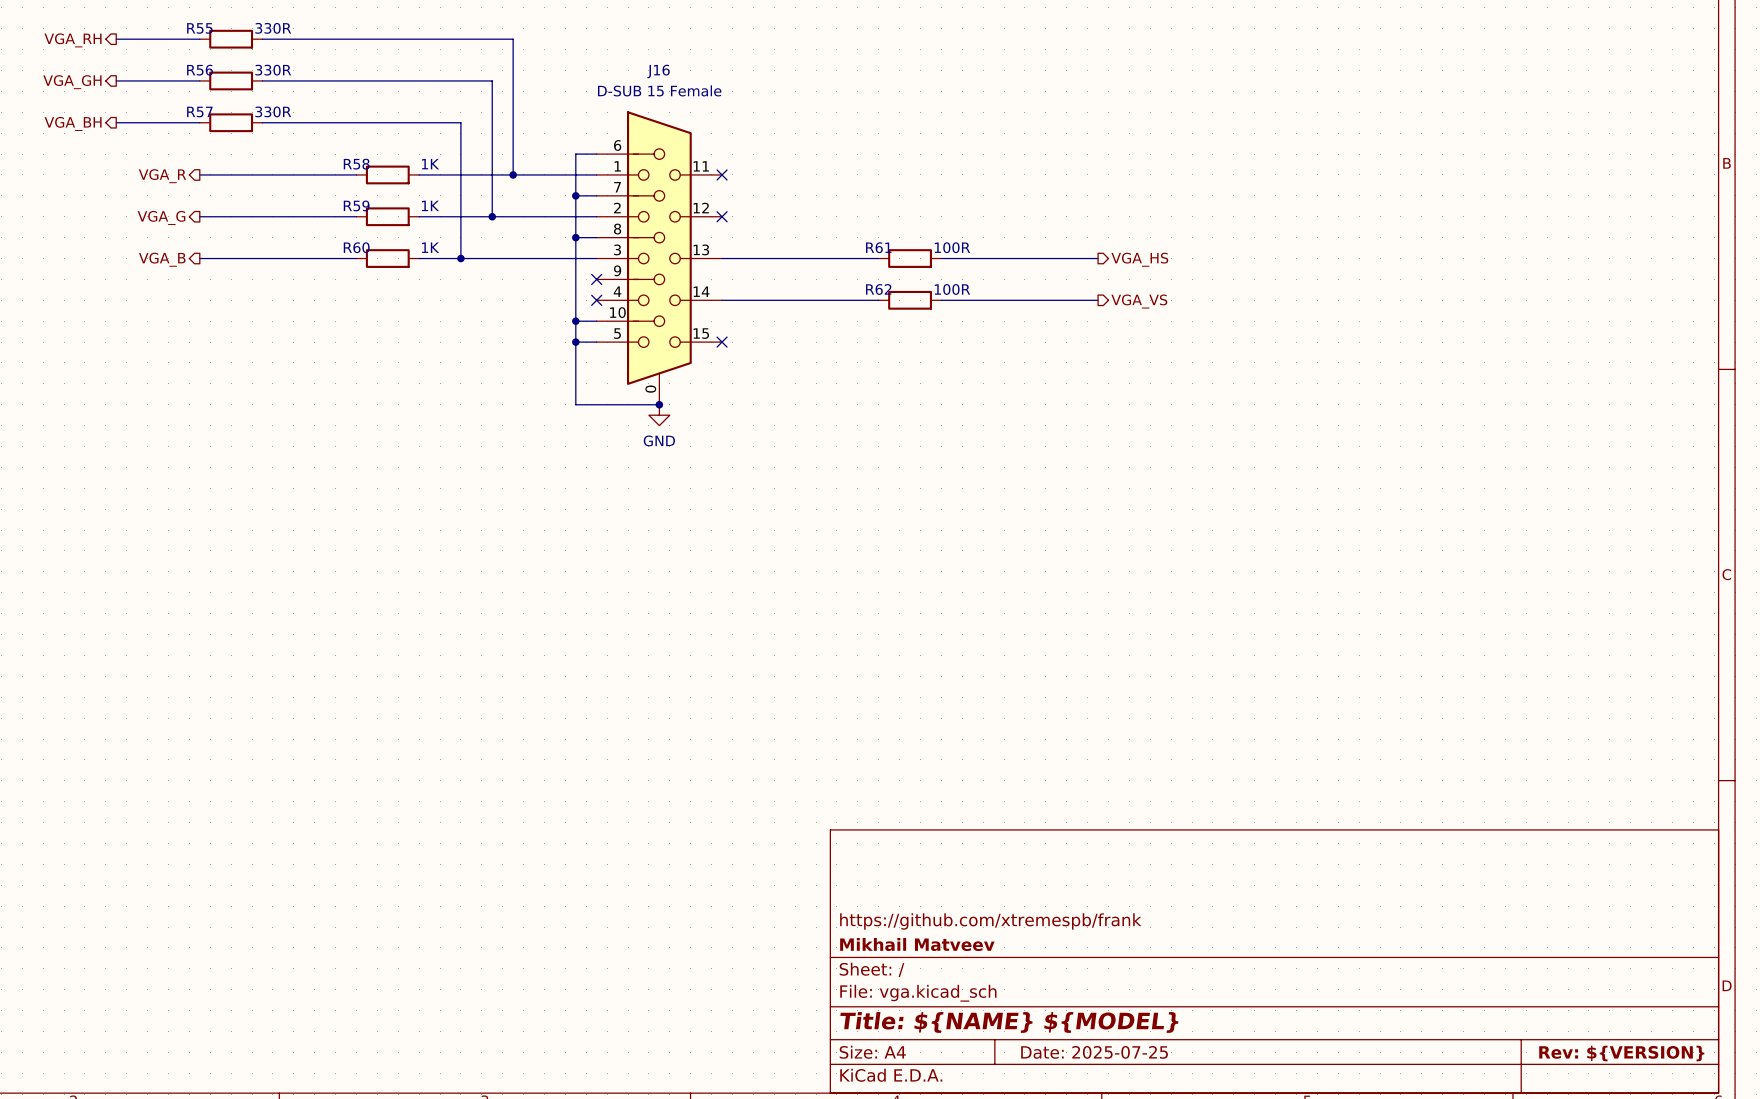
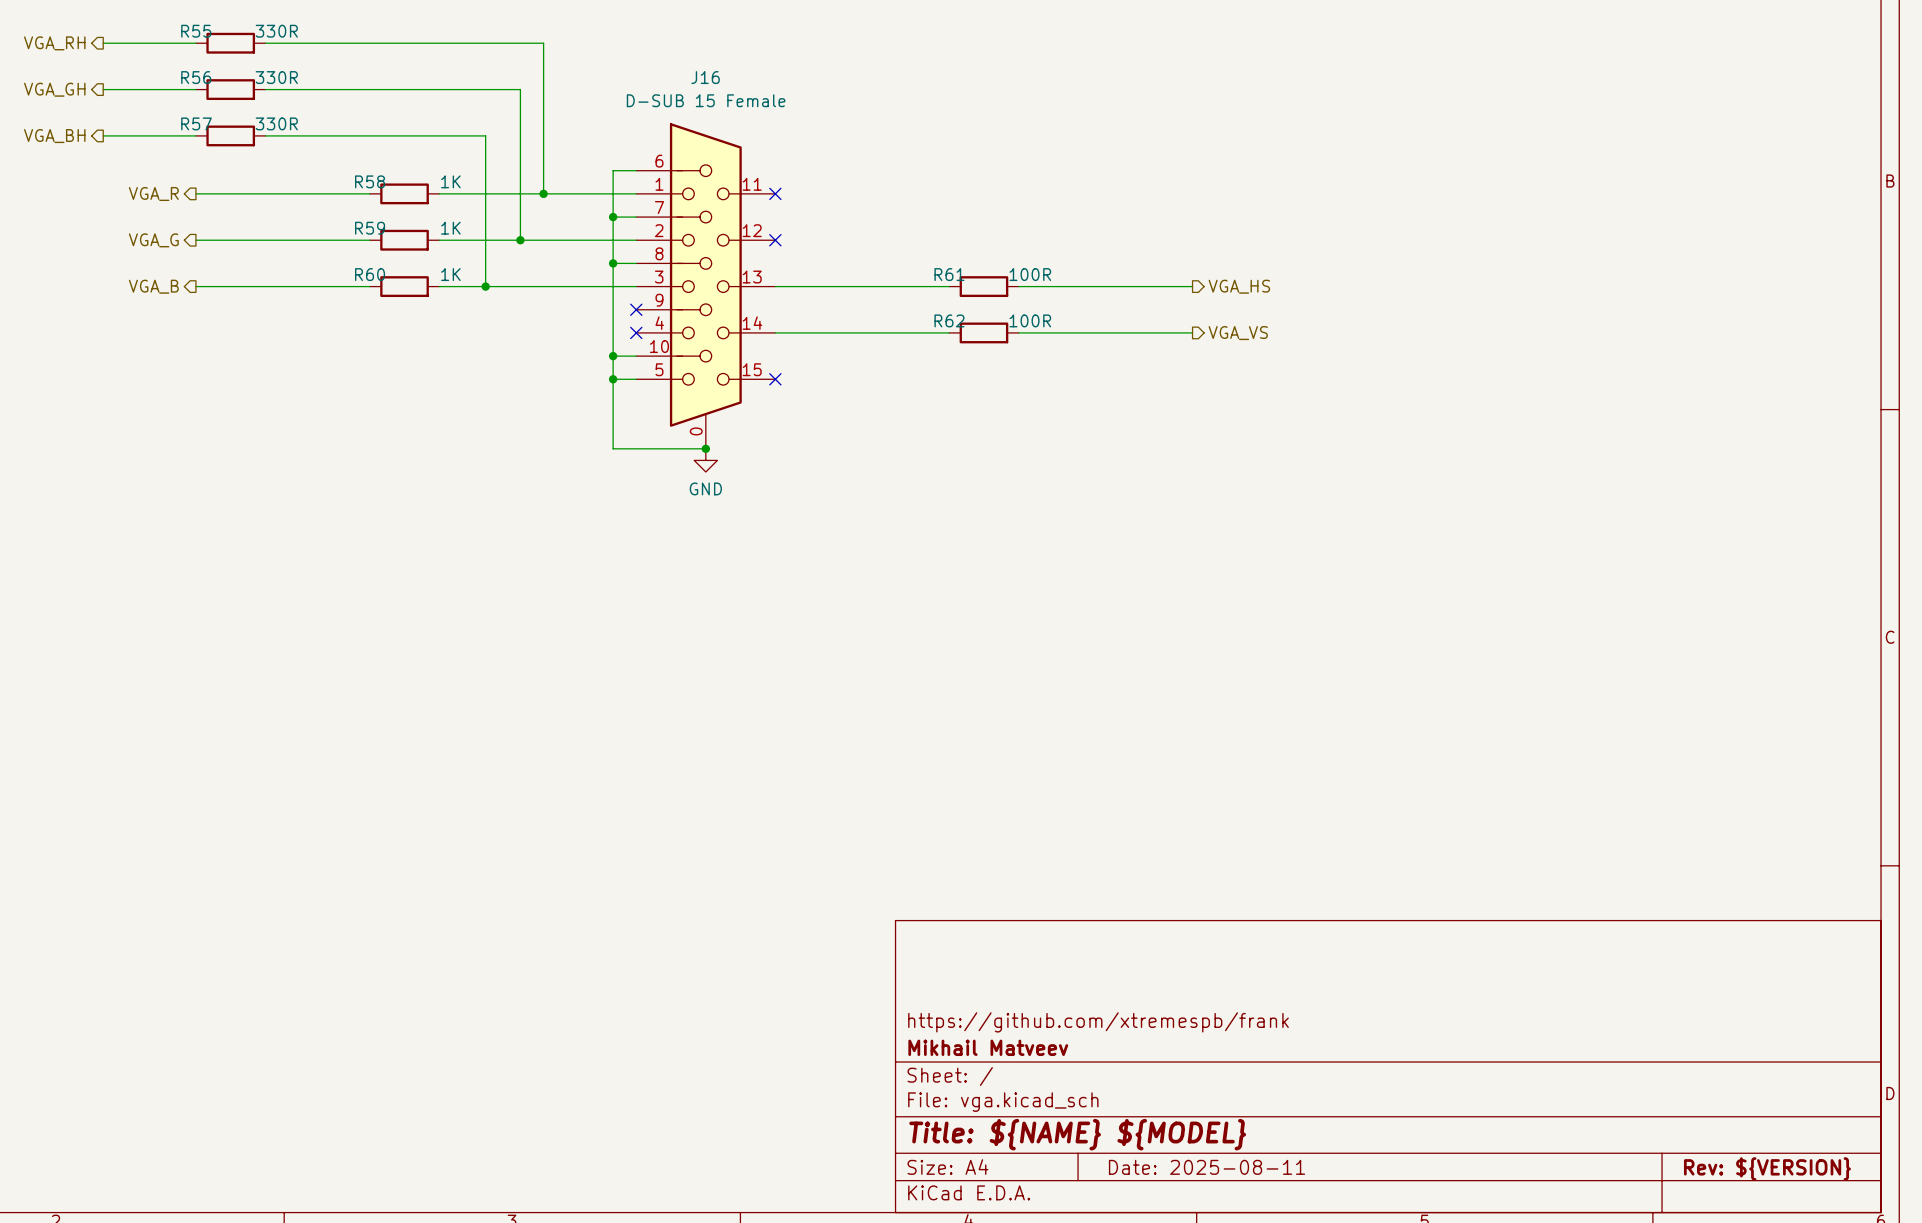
title block: Date: 2025-07-25 (1094, 1052) -> Date: 2025-08-11 (1207, 1167)

